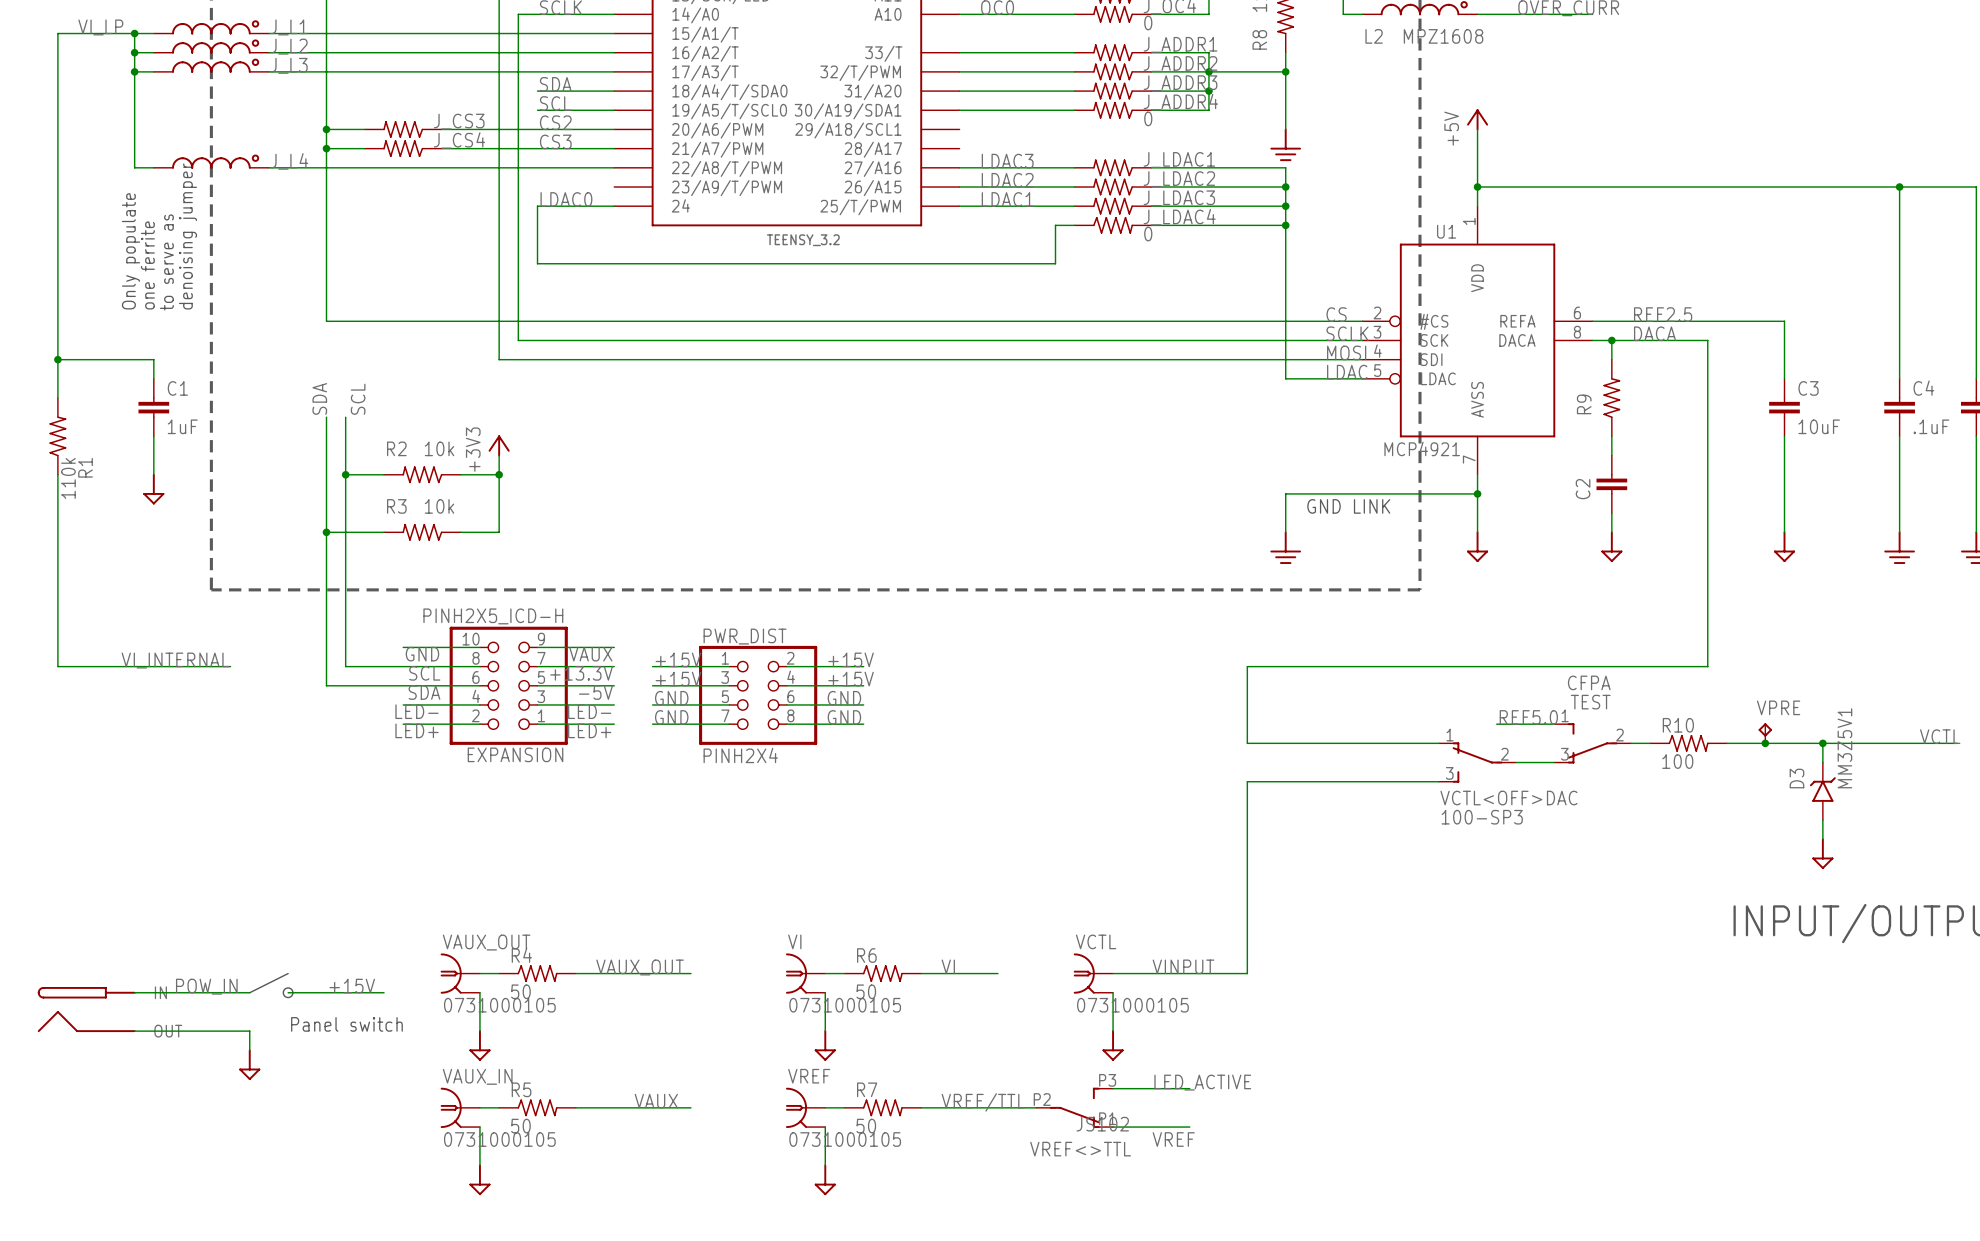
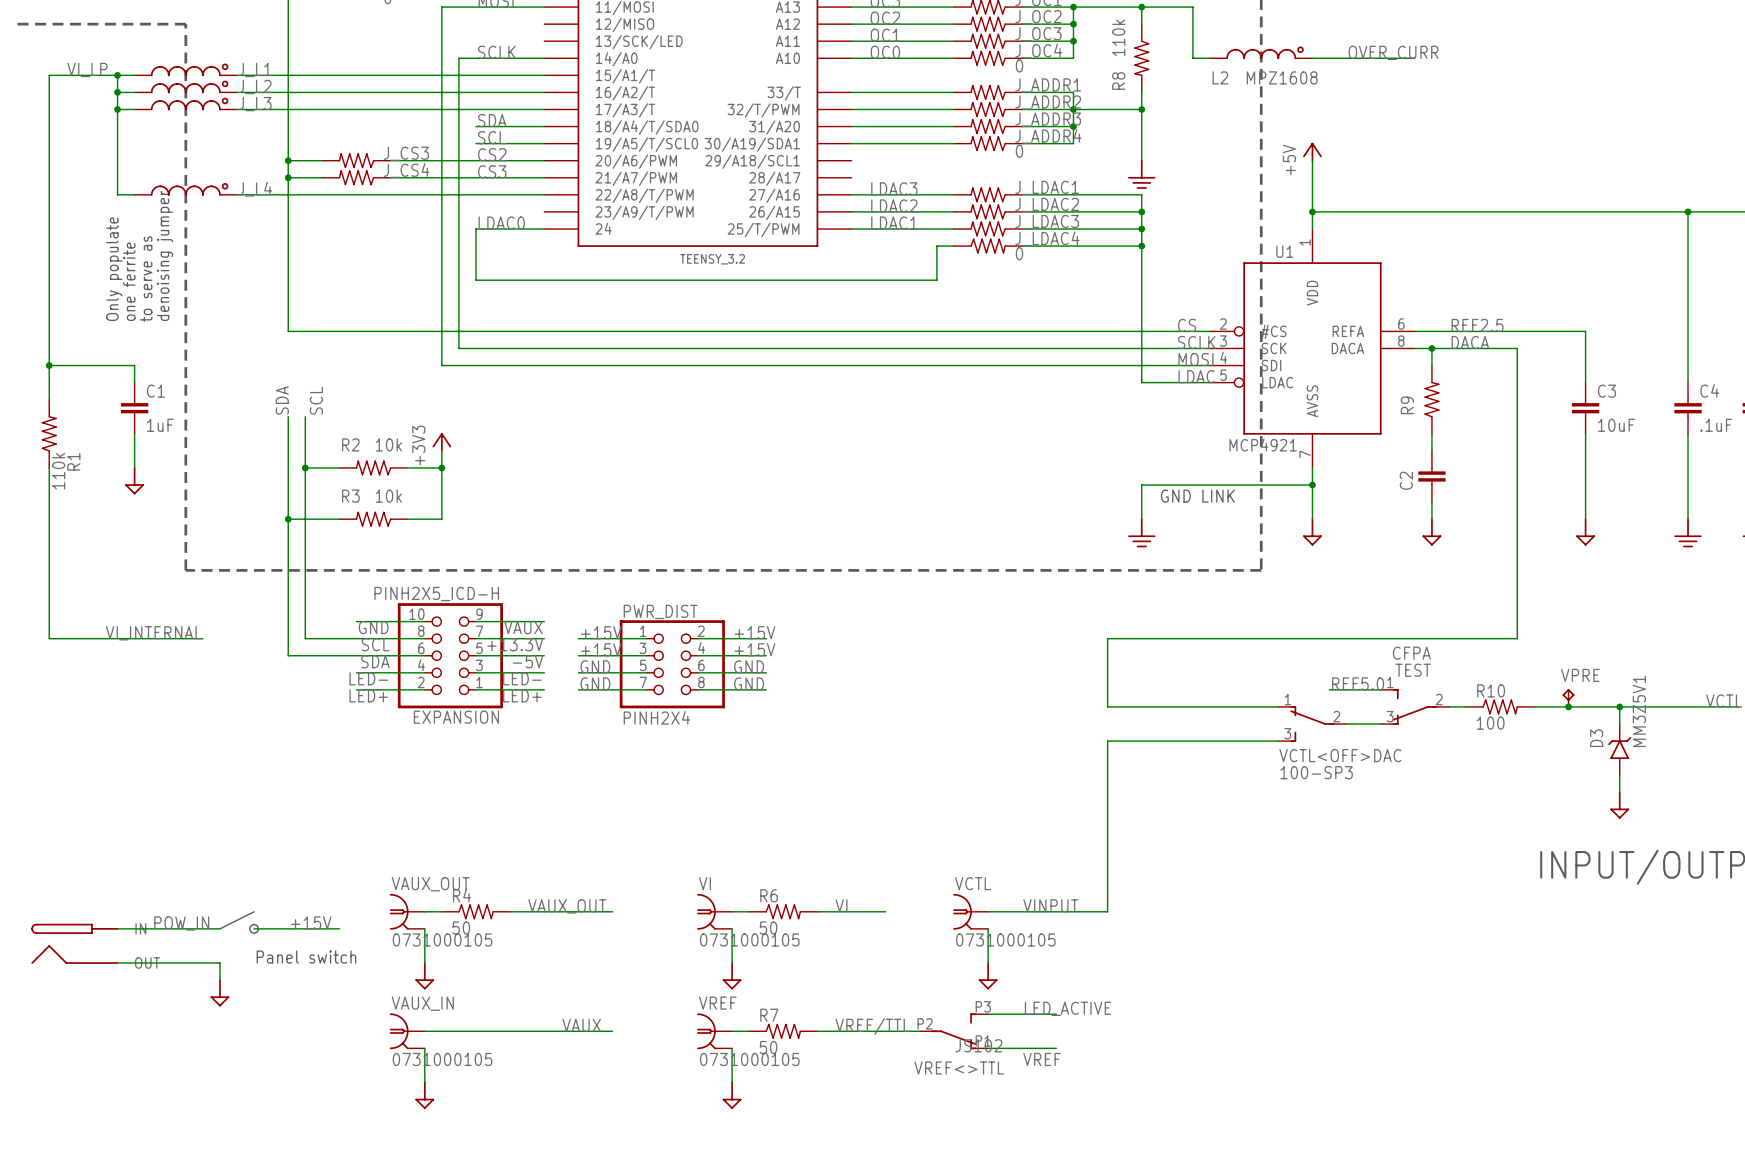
R5: 50 (537, 1107) -> none

